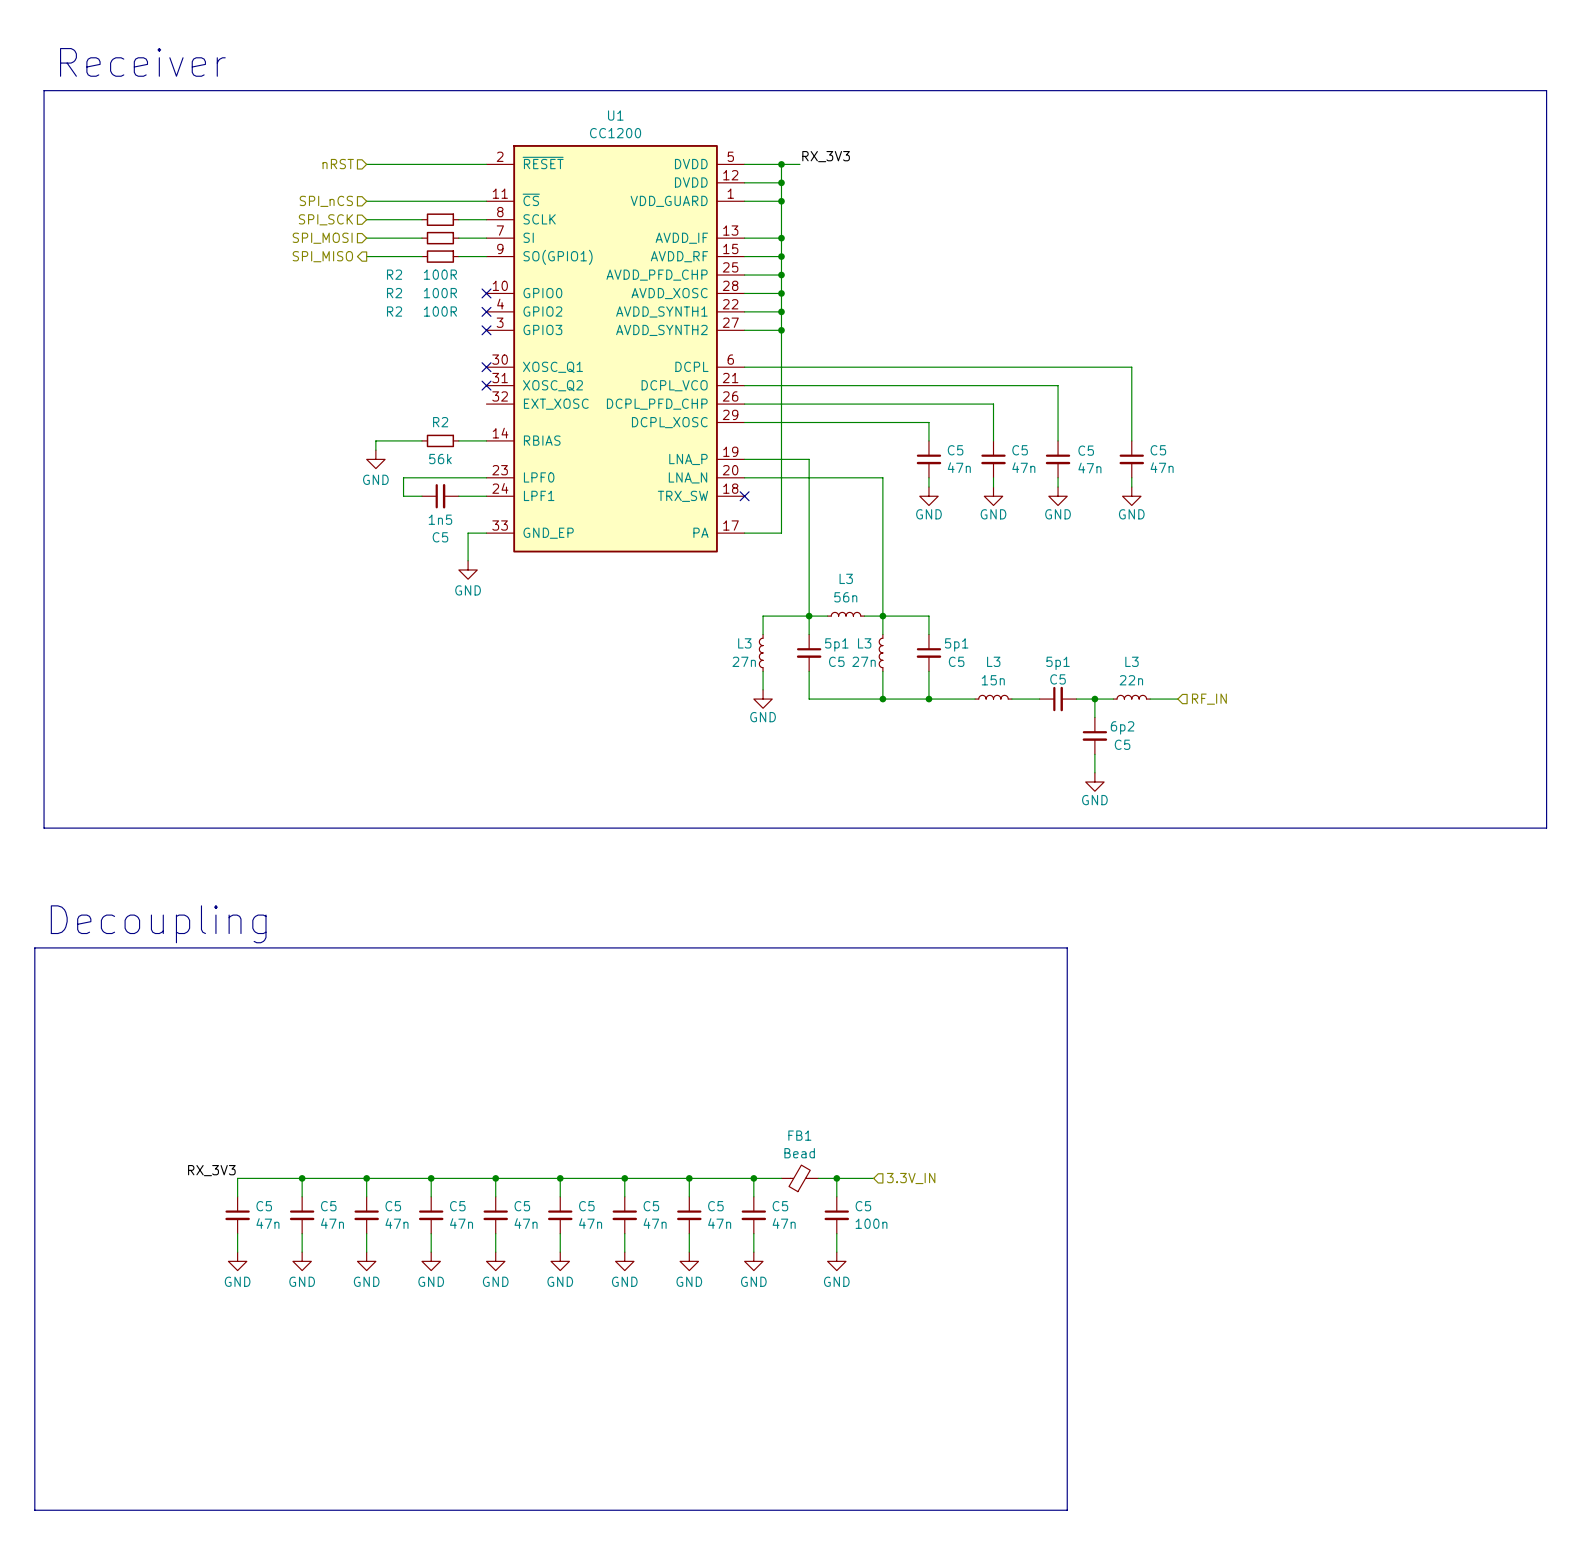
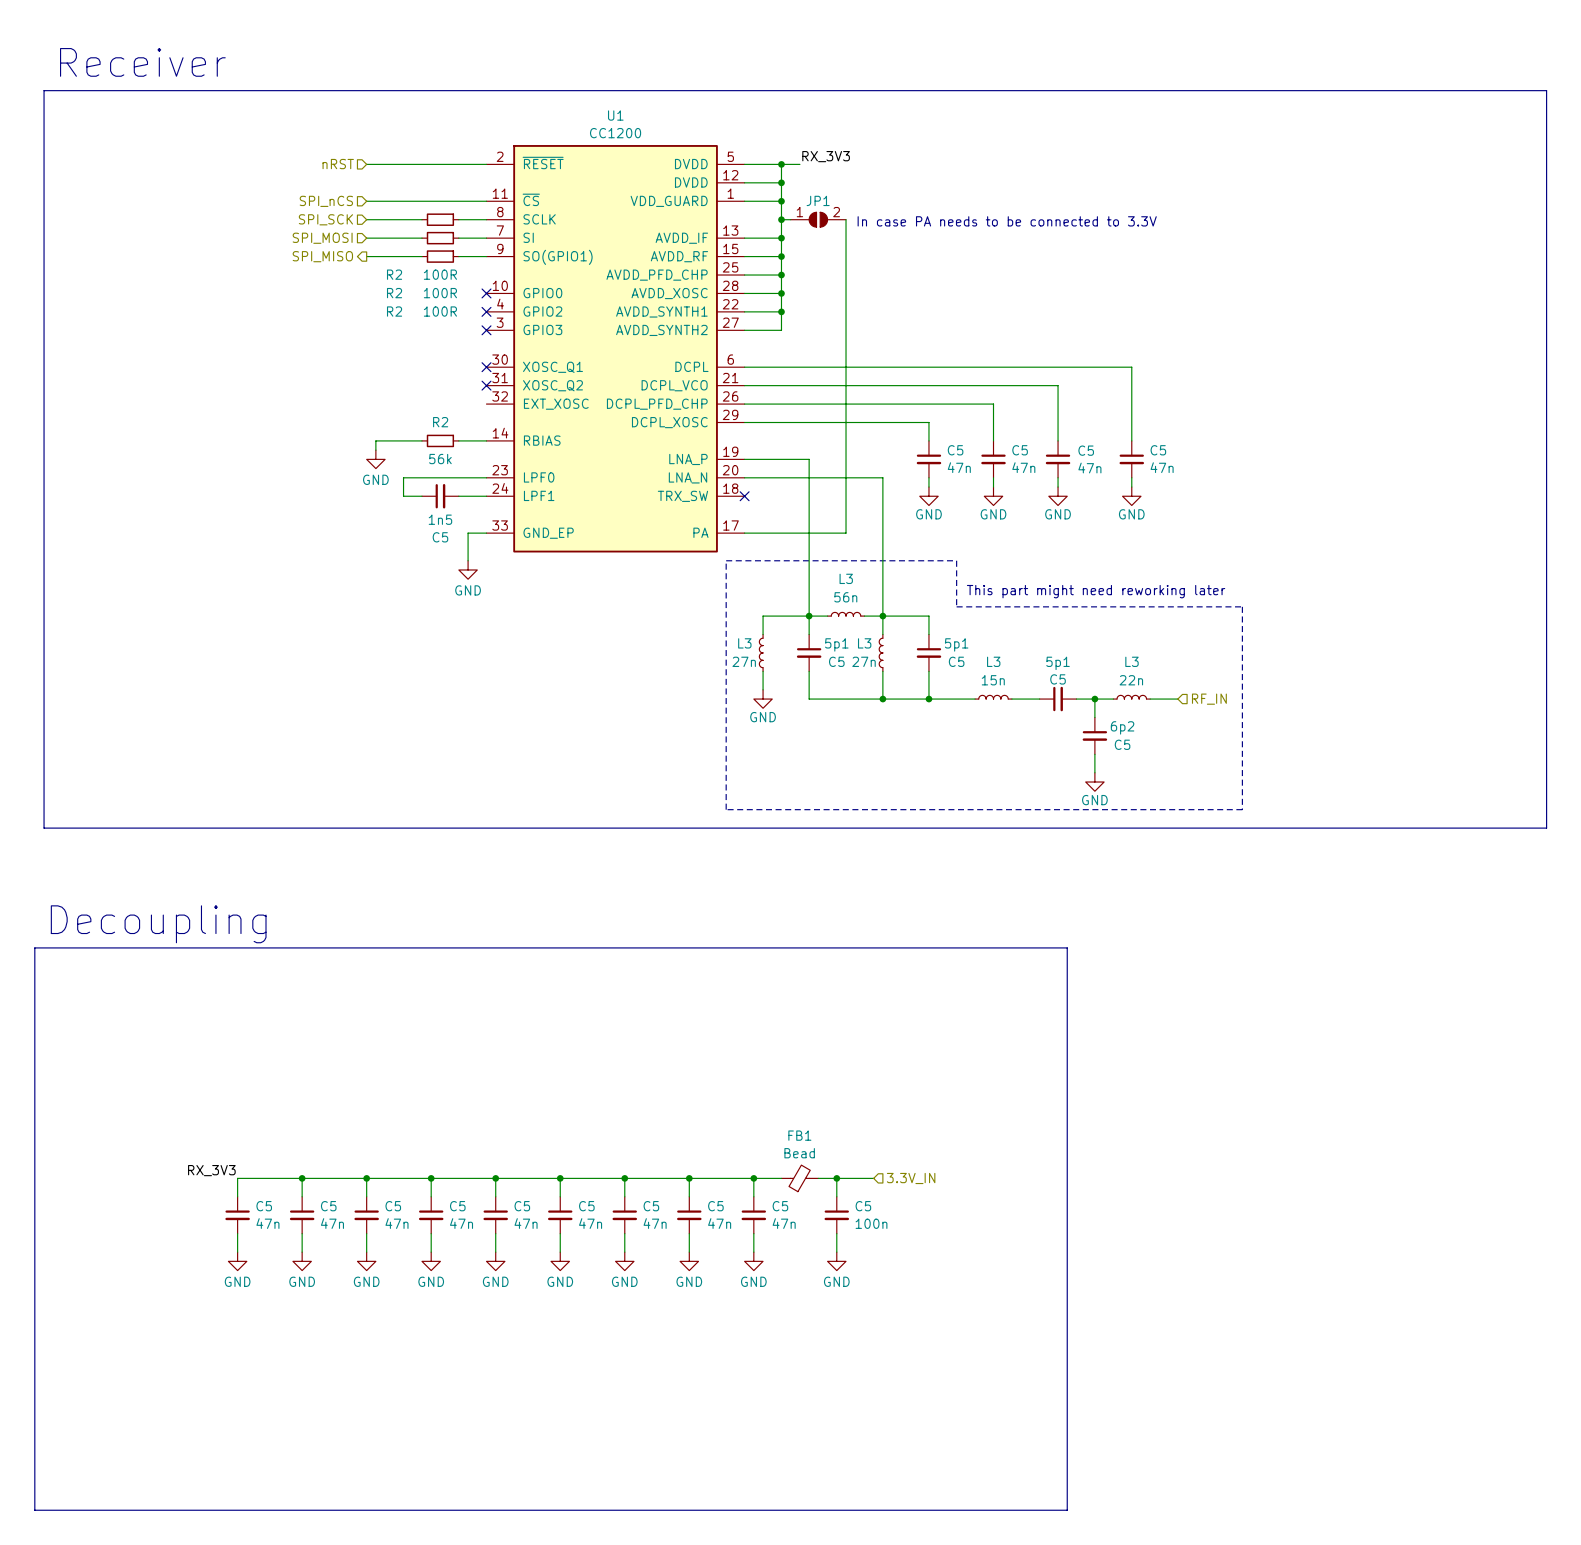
wire: none -> (781, 219) (790, 219)
junction: none -> (781, 219)
JP1: none -> (818, 219)
text: none -> In case PA needs to be connected to 3.3V (1007, 221)
wire: (781, 330) (781, 533) -> (846, 219) (846, 533) (781, 533)
junction: (781, 330) -> none
line: none -> (726, 560) (956, 560) (956, 606) (1242, 606) (1242, 809) (726, 809) (726, 560)
text: none -> This part might need reworking later (1096, 591)

